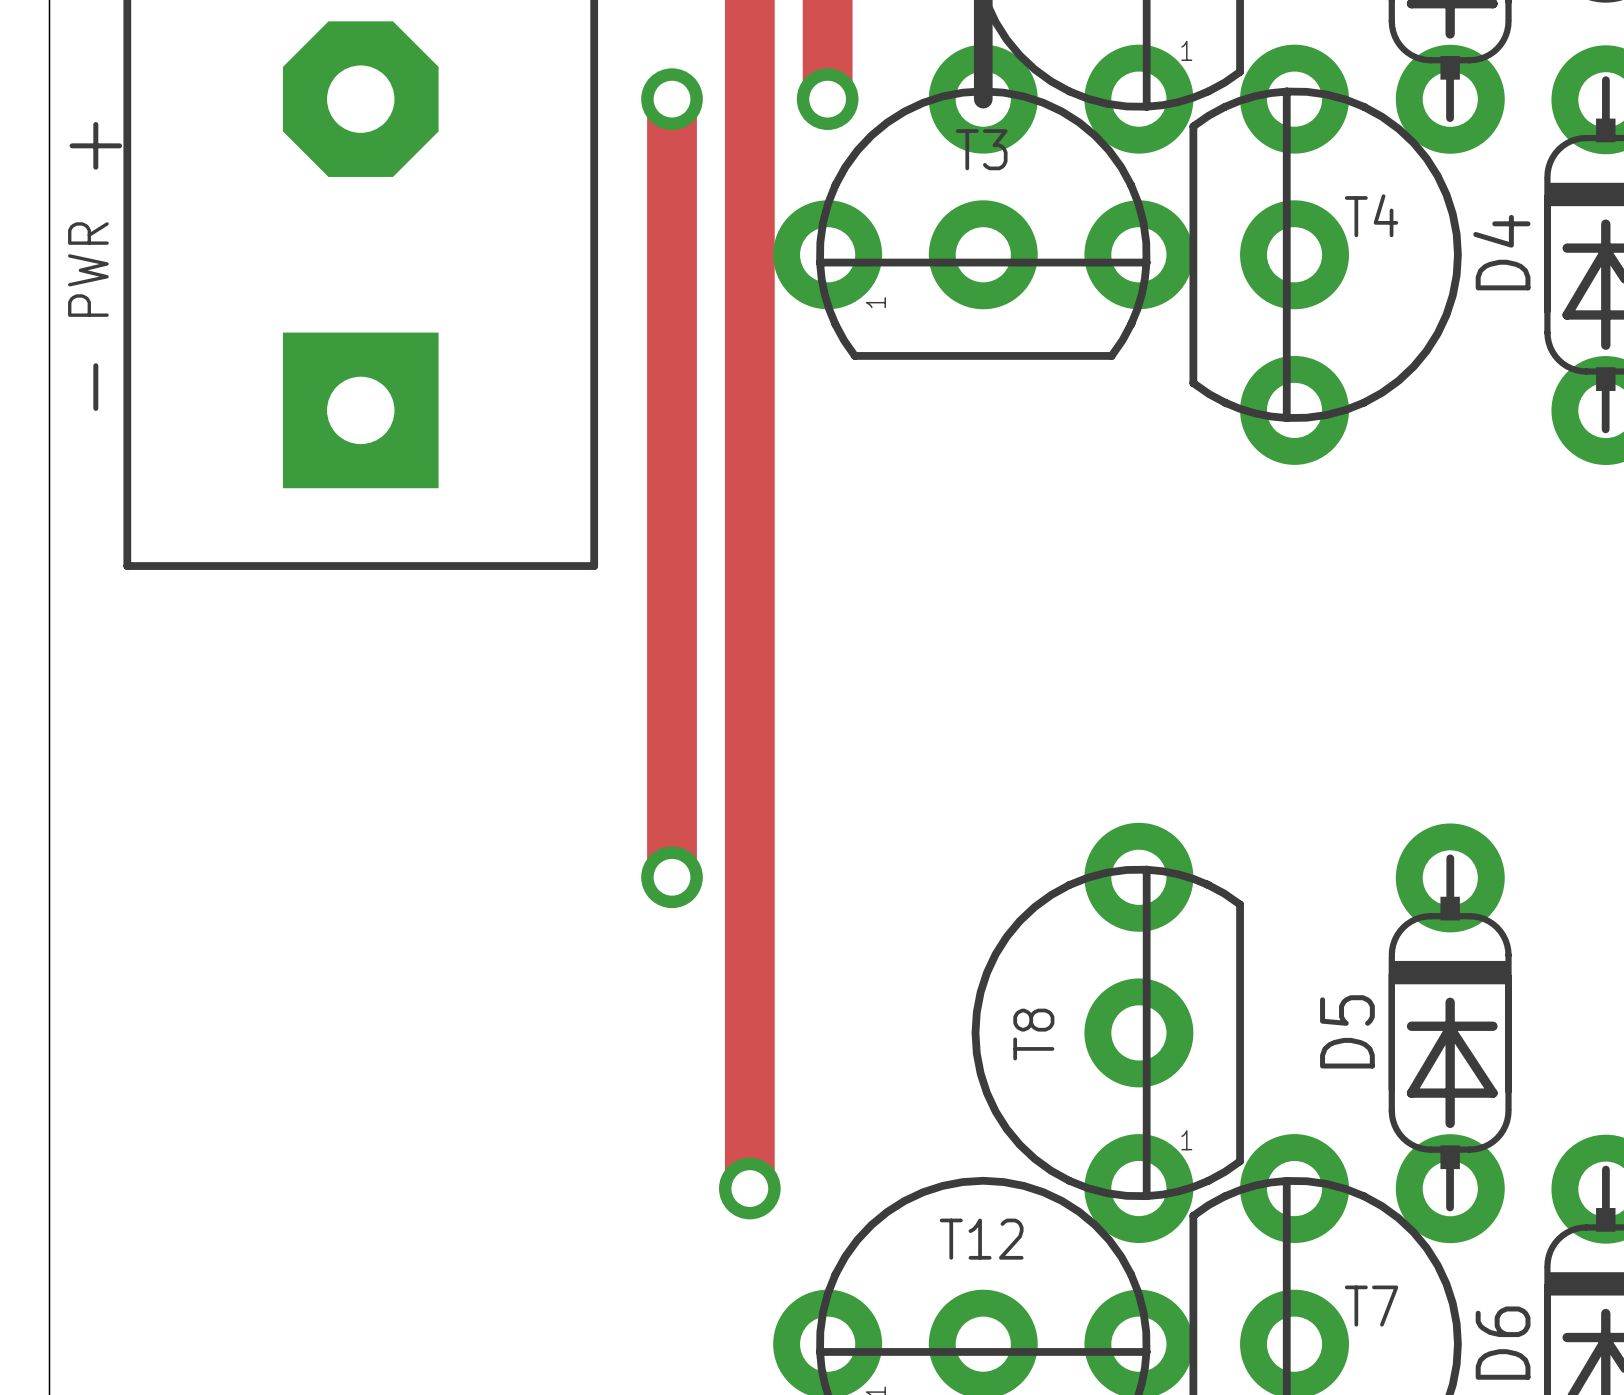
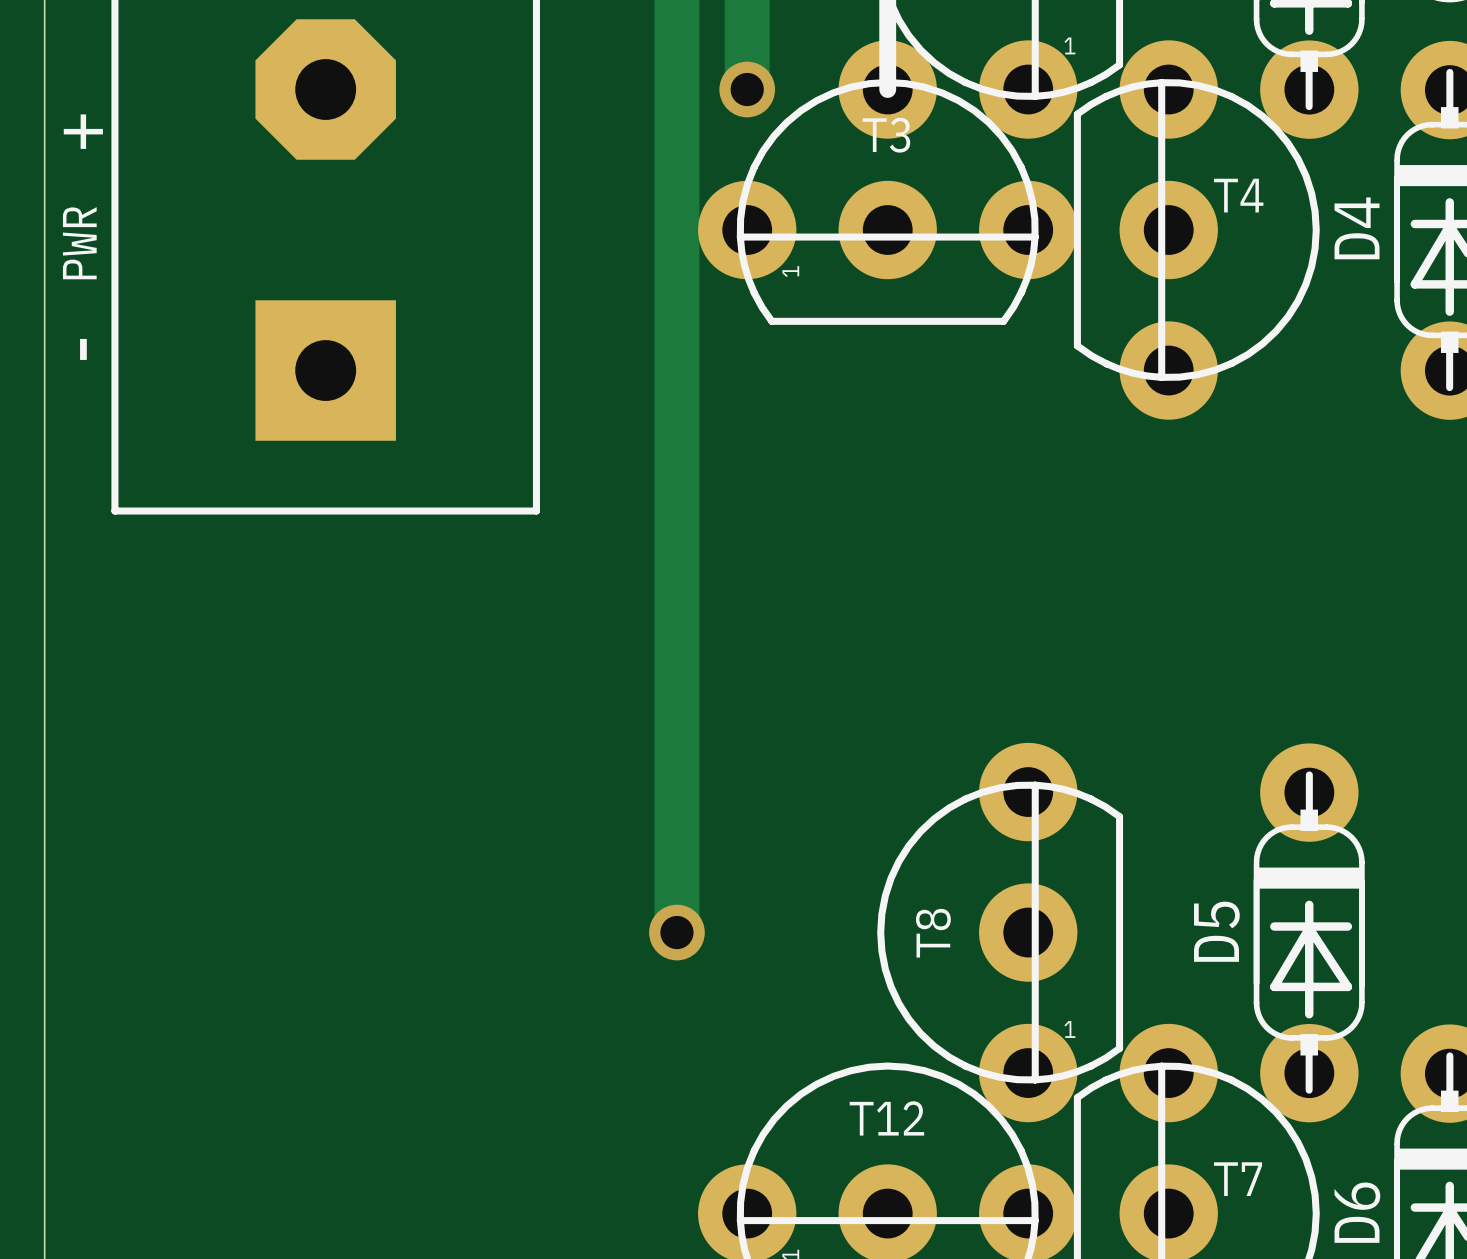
track: (672, 99) (672, 877) -> none
via: (672, 99) -> none
via: (672, 877) -> none
track: (749, 1032) (749, 1188) -> none
via: none -> (676, 932)
via: (749, 1188) -> none

